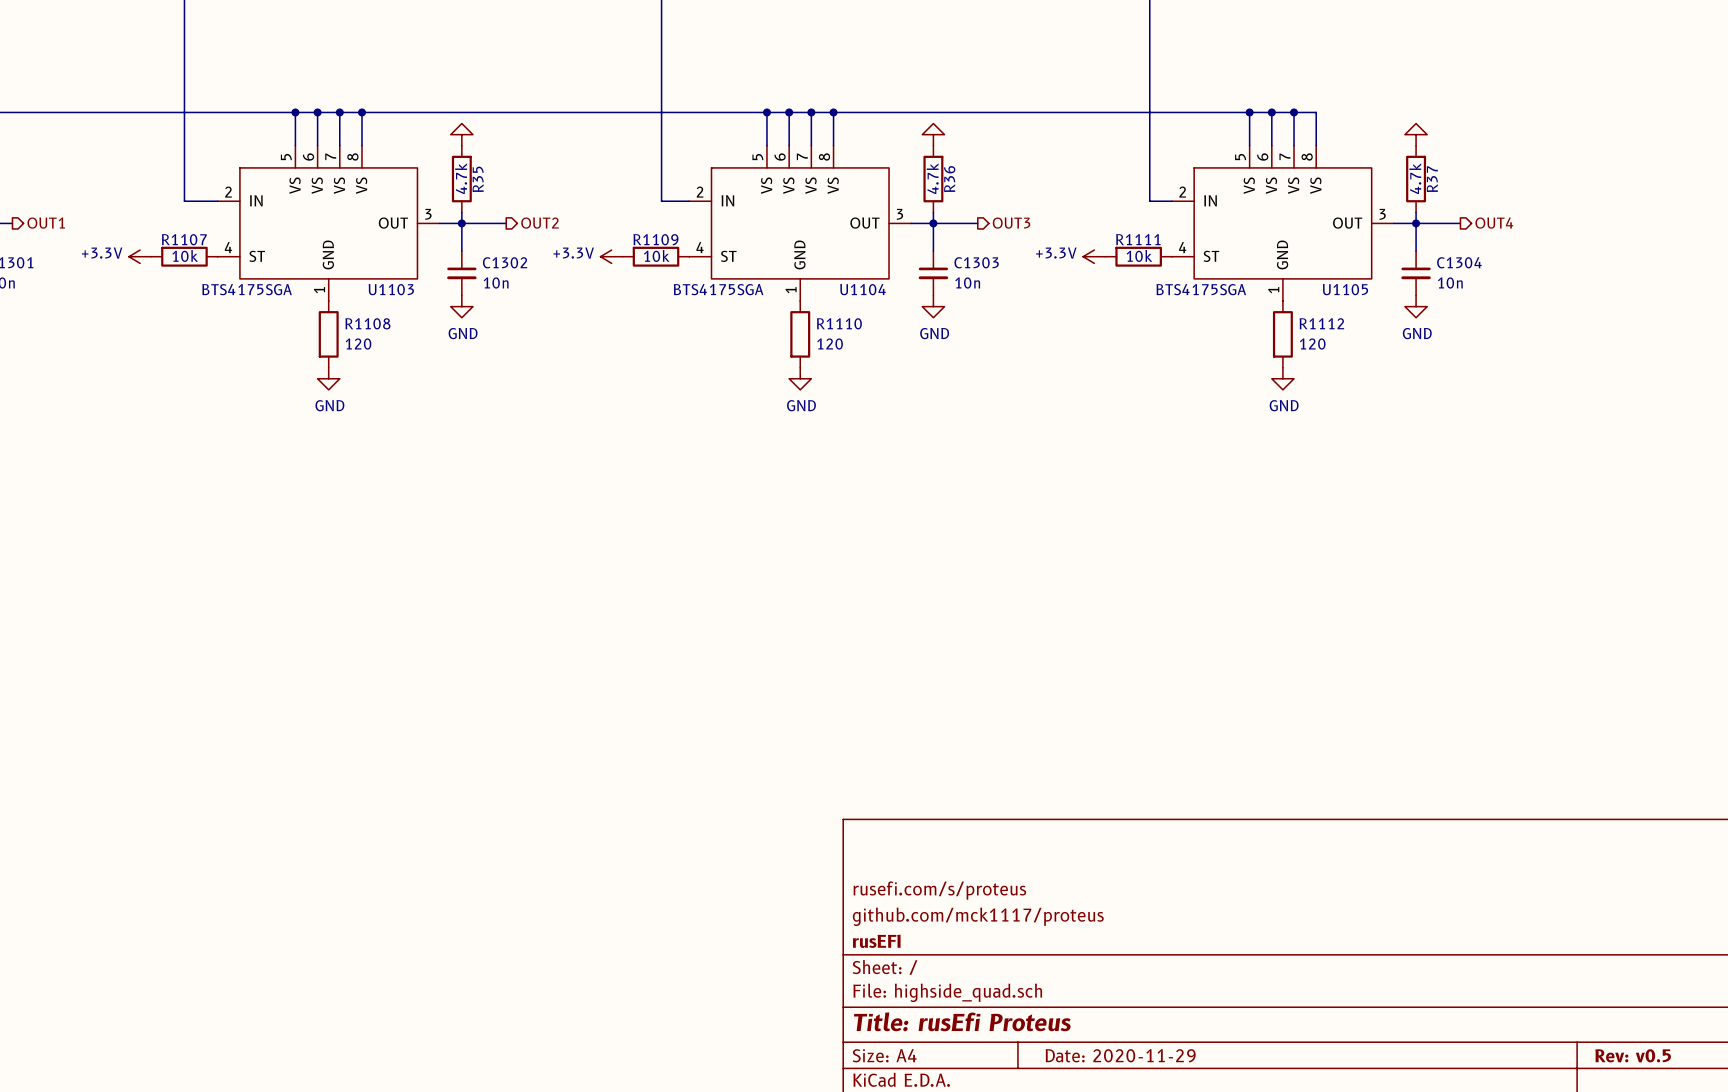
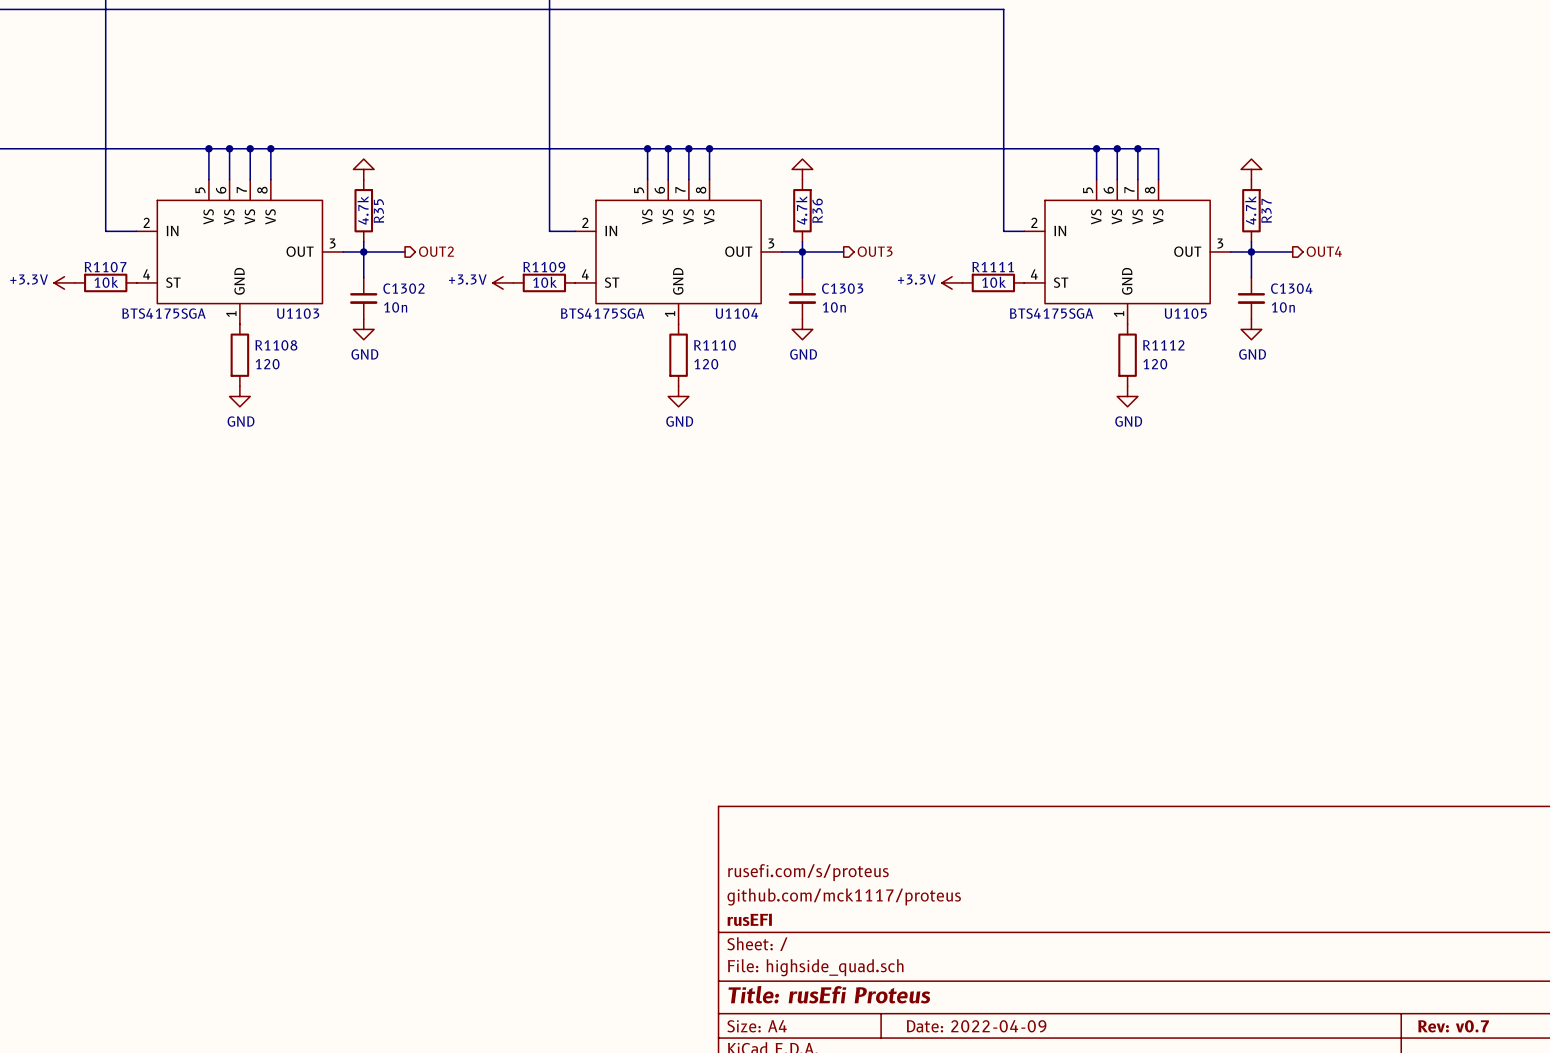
title block: Date: 2020-11-29 (1120, 1055) -> Date: 2022-04-09 (976, 1026)
title block: Rev: v0.5 (1633, 1055) -> Rev: v0.7 (1453, 1026)

